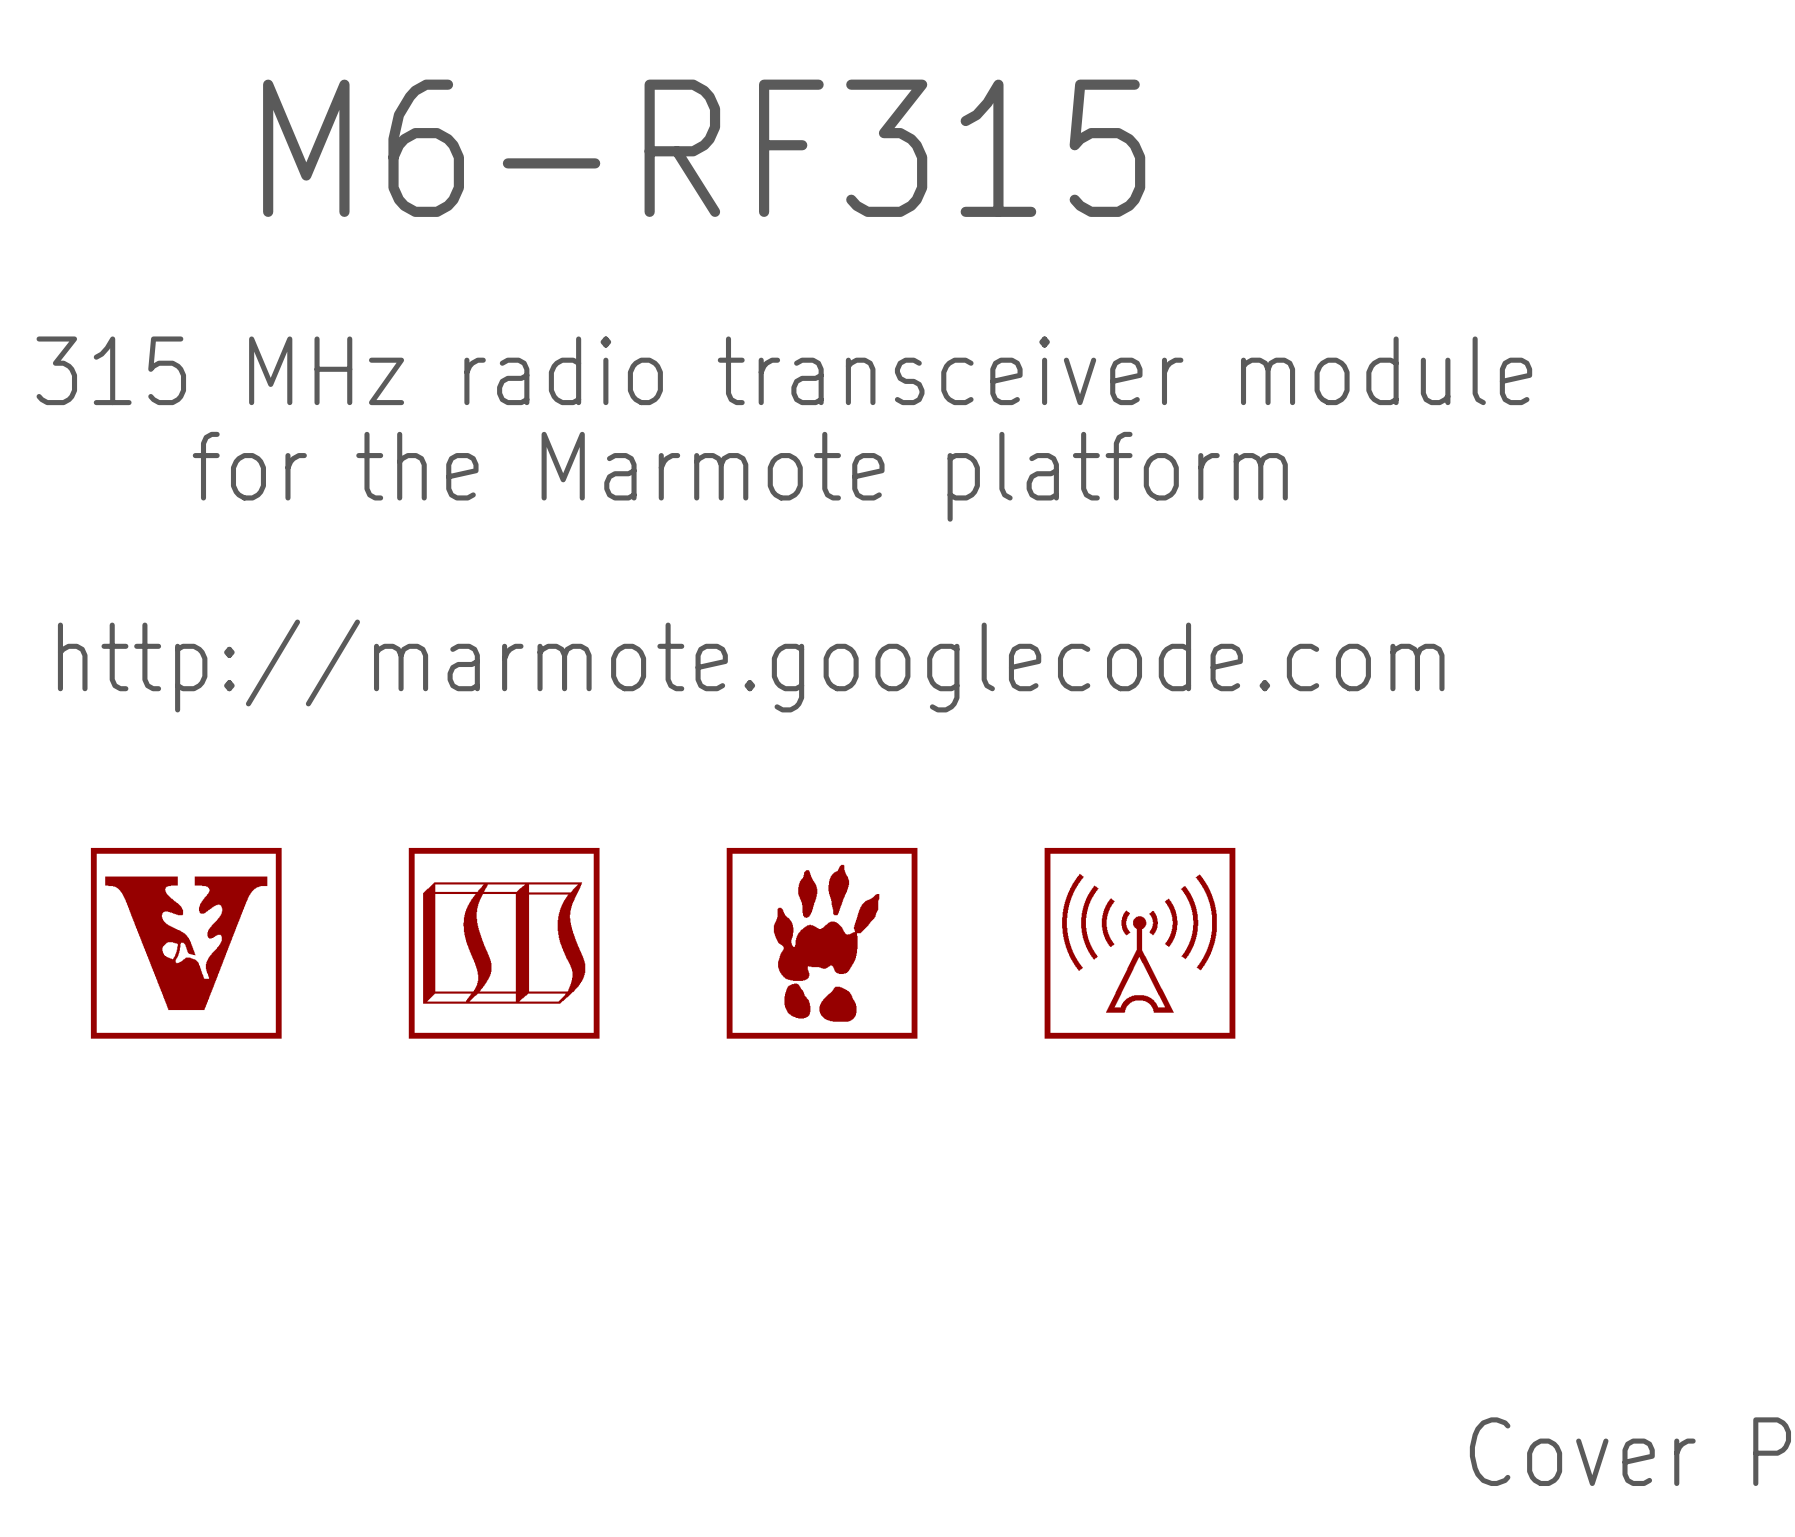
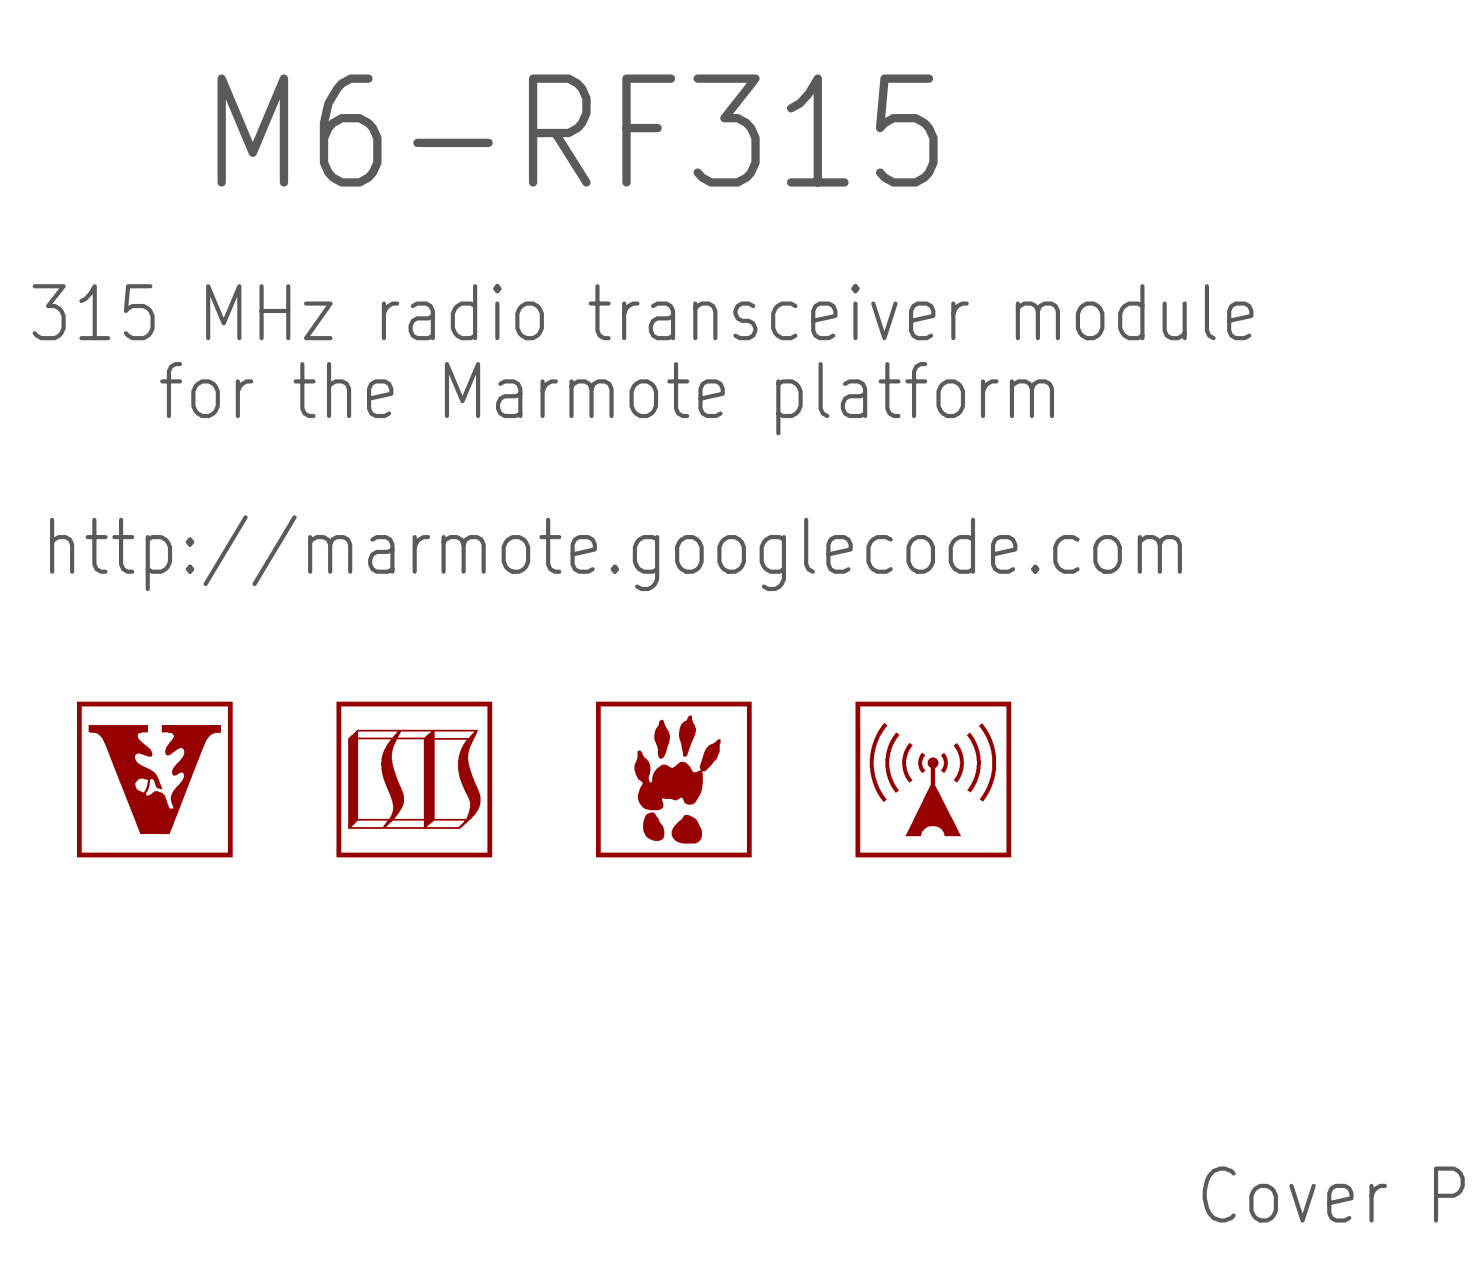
part symbol: [1044, 847, 1236, 1039] -> [855, 701, 1012, 858]

